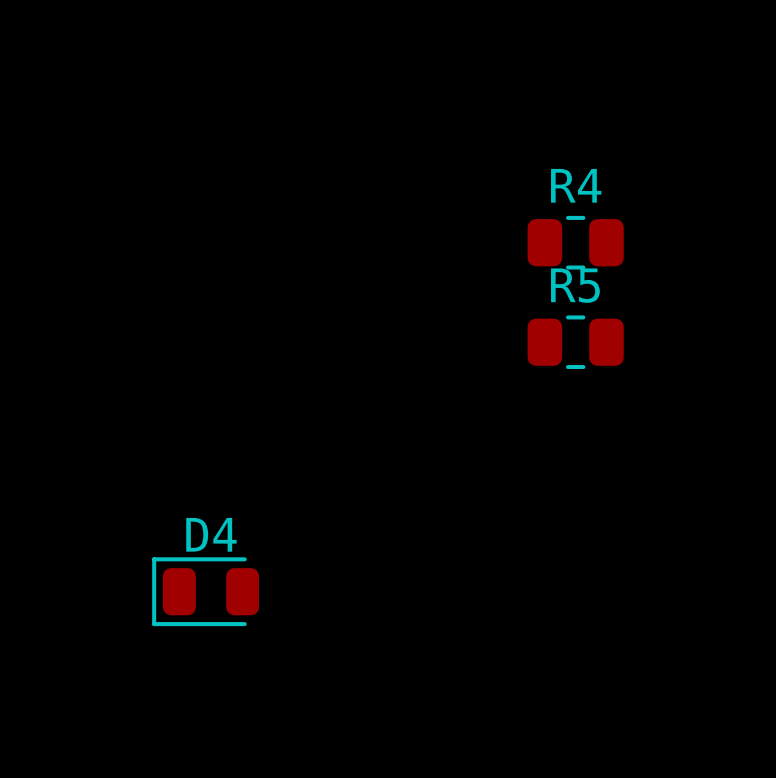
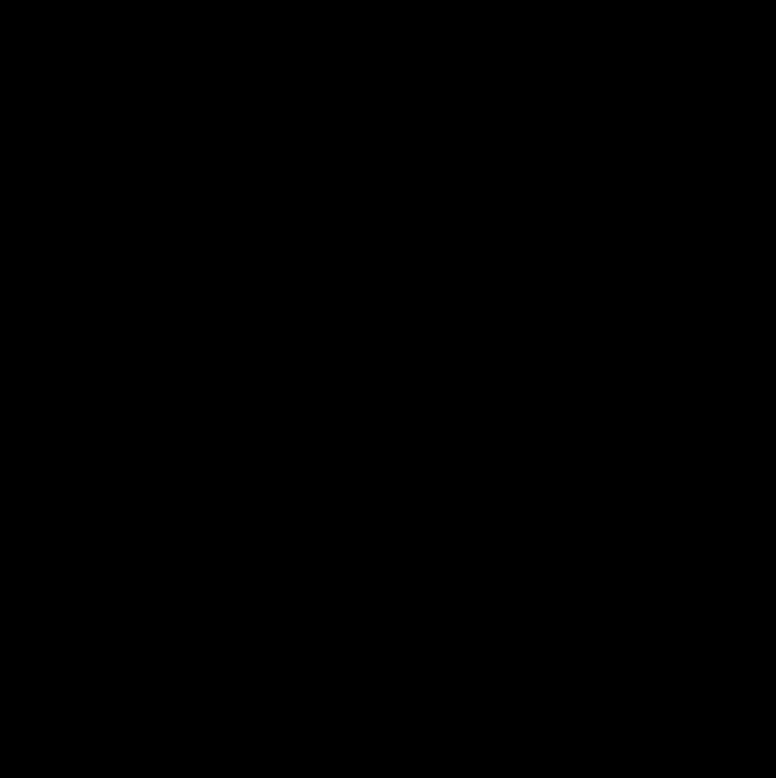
R4: (575, 242) -> none
R5: (575, 342) -> none
D4: (205, 591) -> none

